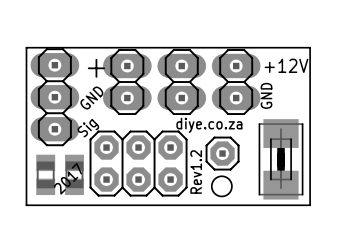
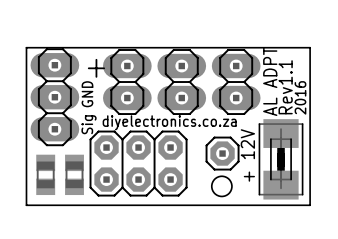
text: +12V (286, 65) -> none
text: none -> Rev1.1 (285, 87)
text: GND (266, 95) -> AL ADPT (270, 81)
text: none -> 2016 (300, 97)
text rotation: 0° (91, 98) -> 45° counterclockwise (87, 94)
text: diye.co.za (209, 125) -> diyelectronics.co.za (169, 122)
text rotation: 0° (88, 128) -> 45° counterclockwise (89, 124)
text: none -> + 12V (247, 155)
text: Rev1.2 (196, 172) -> none
text: 2017 (68, 178) -> none

